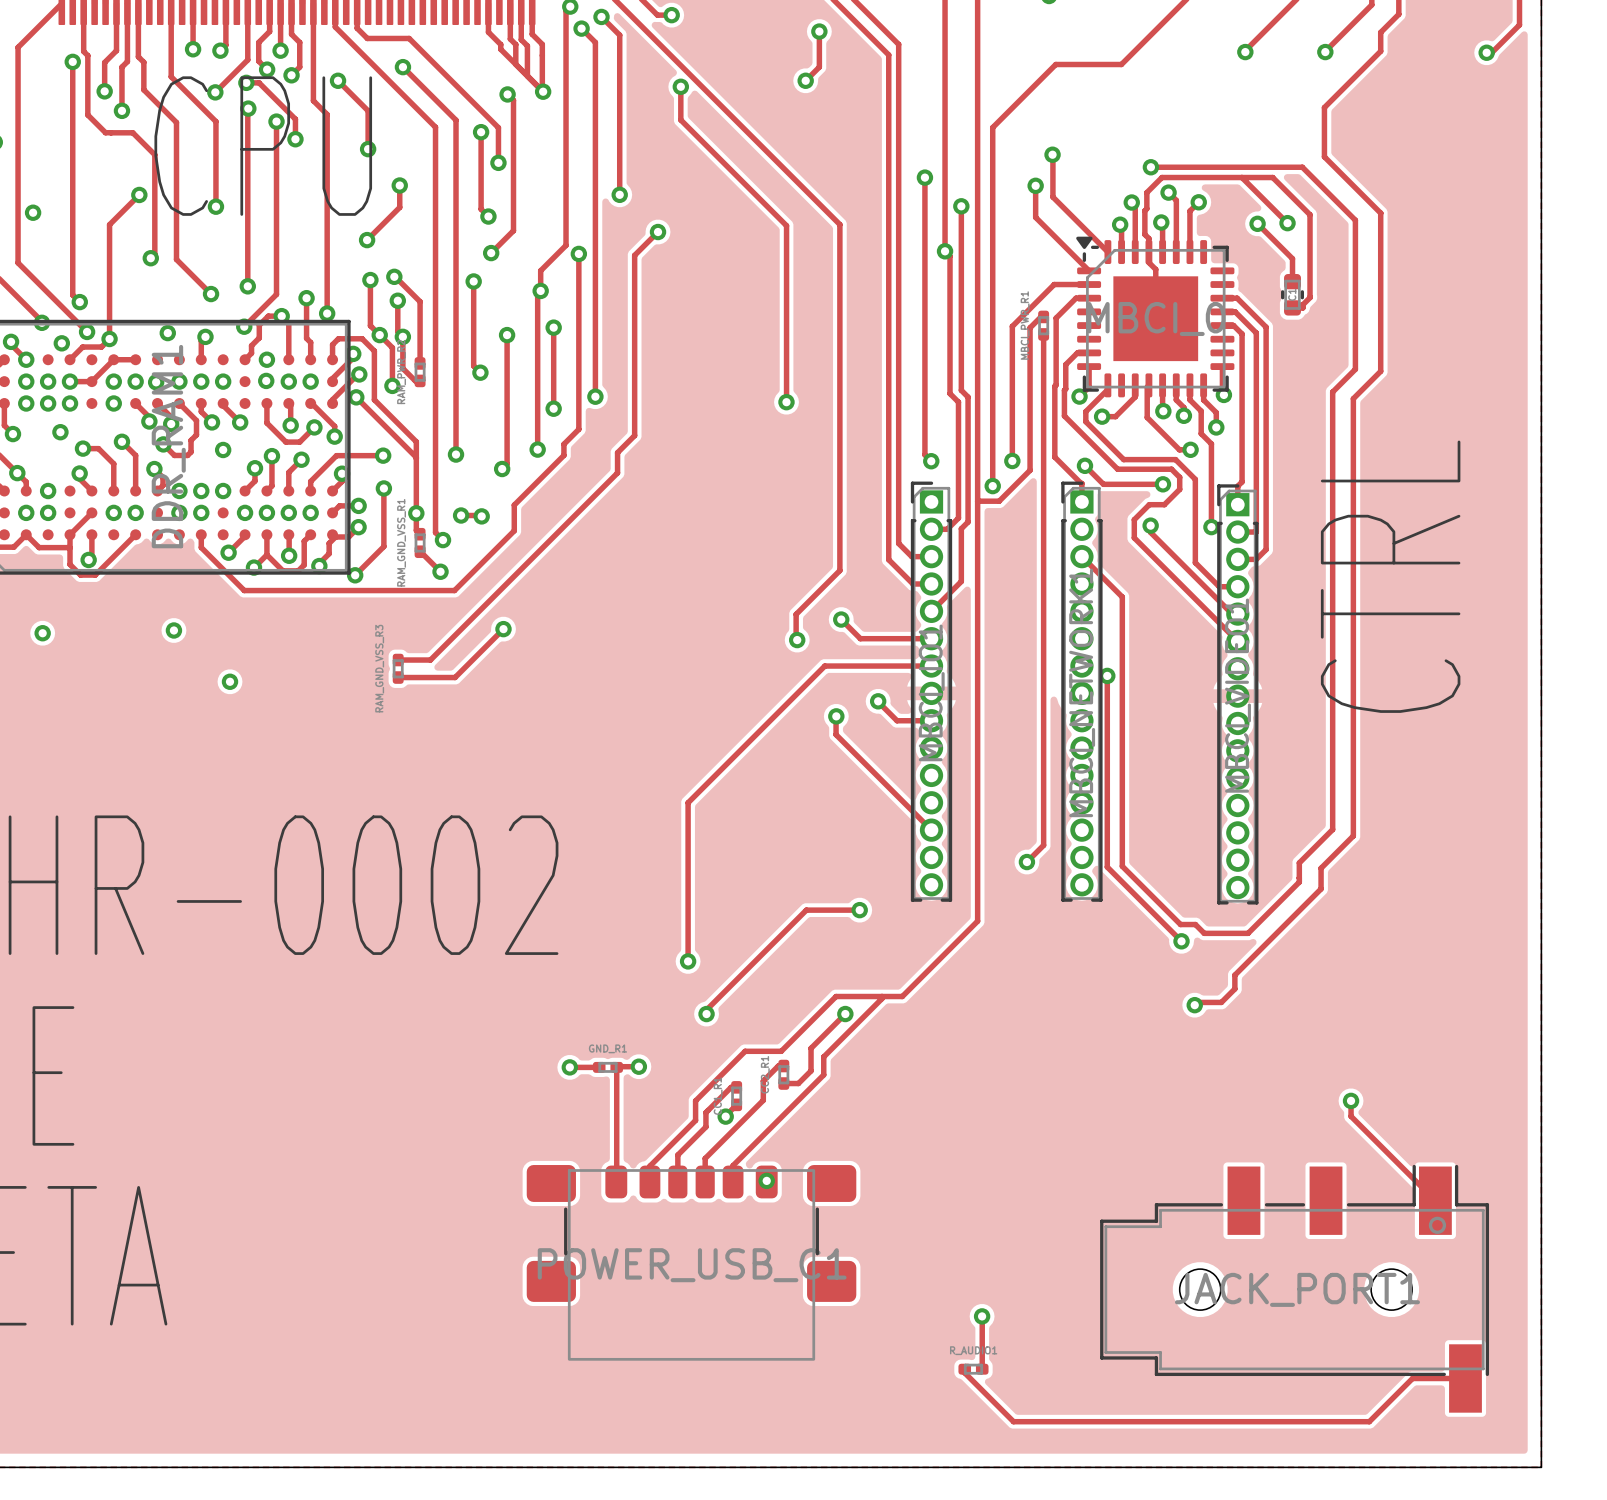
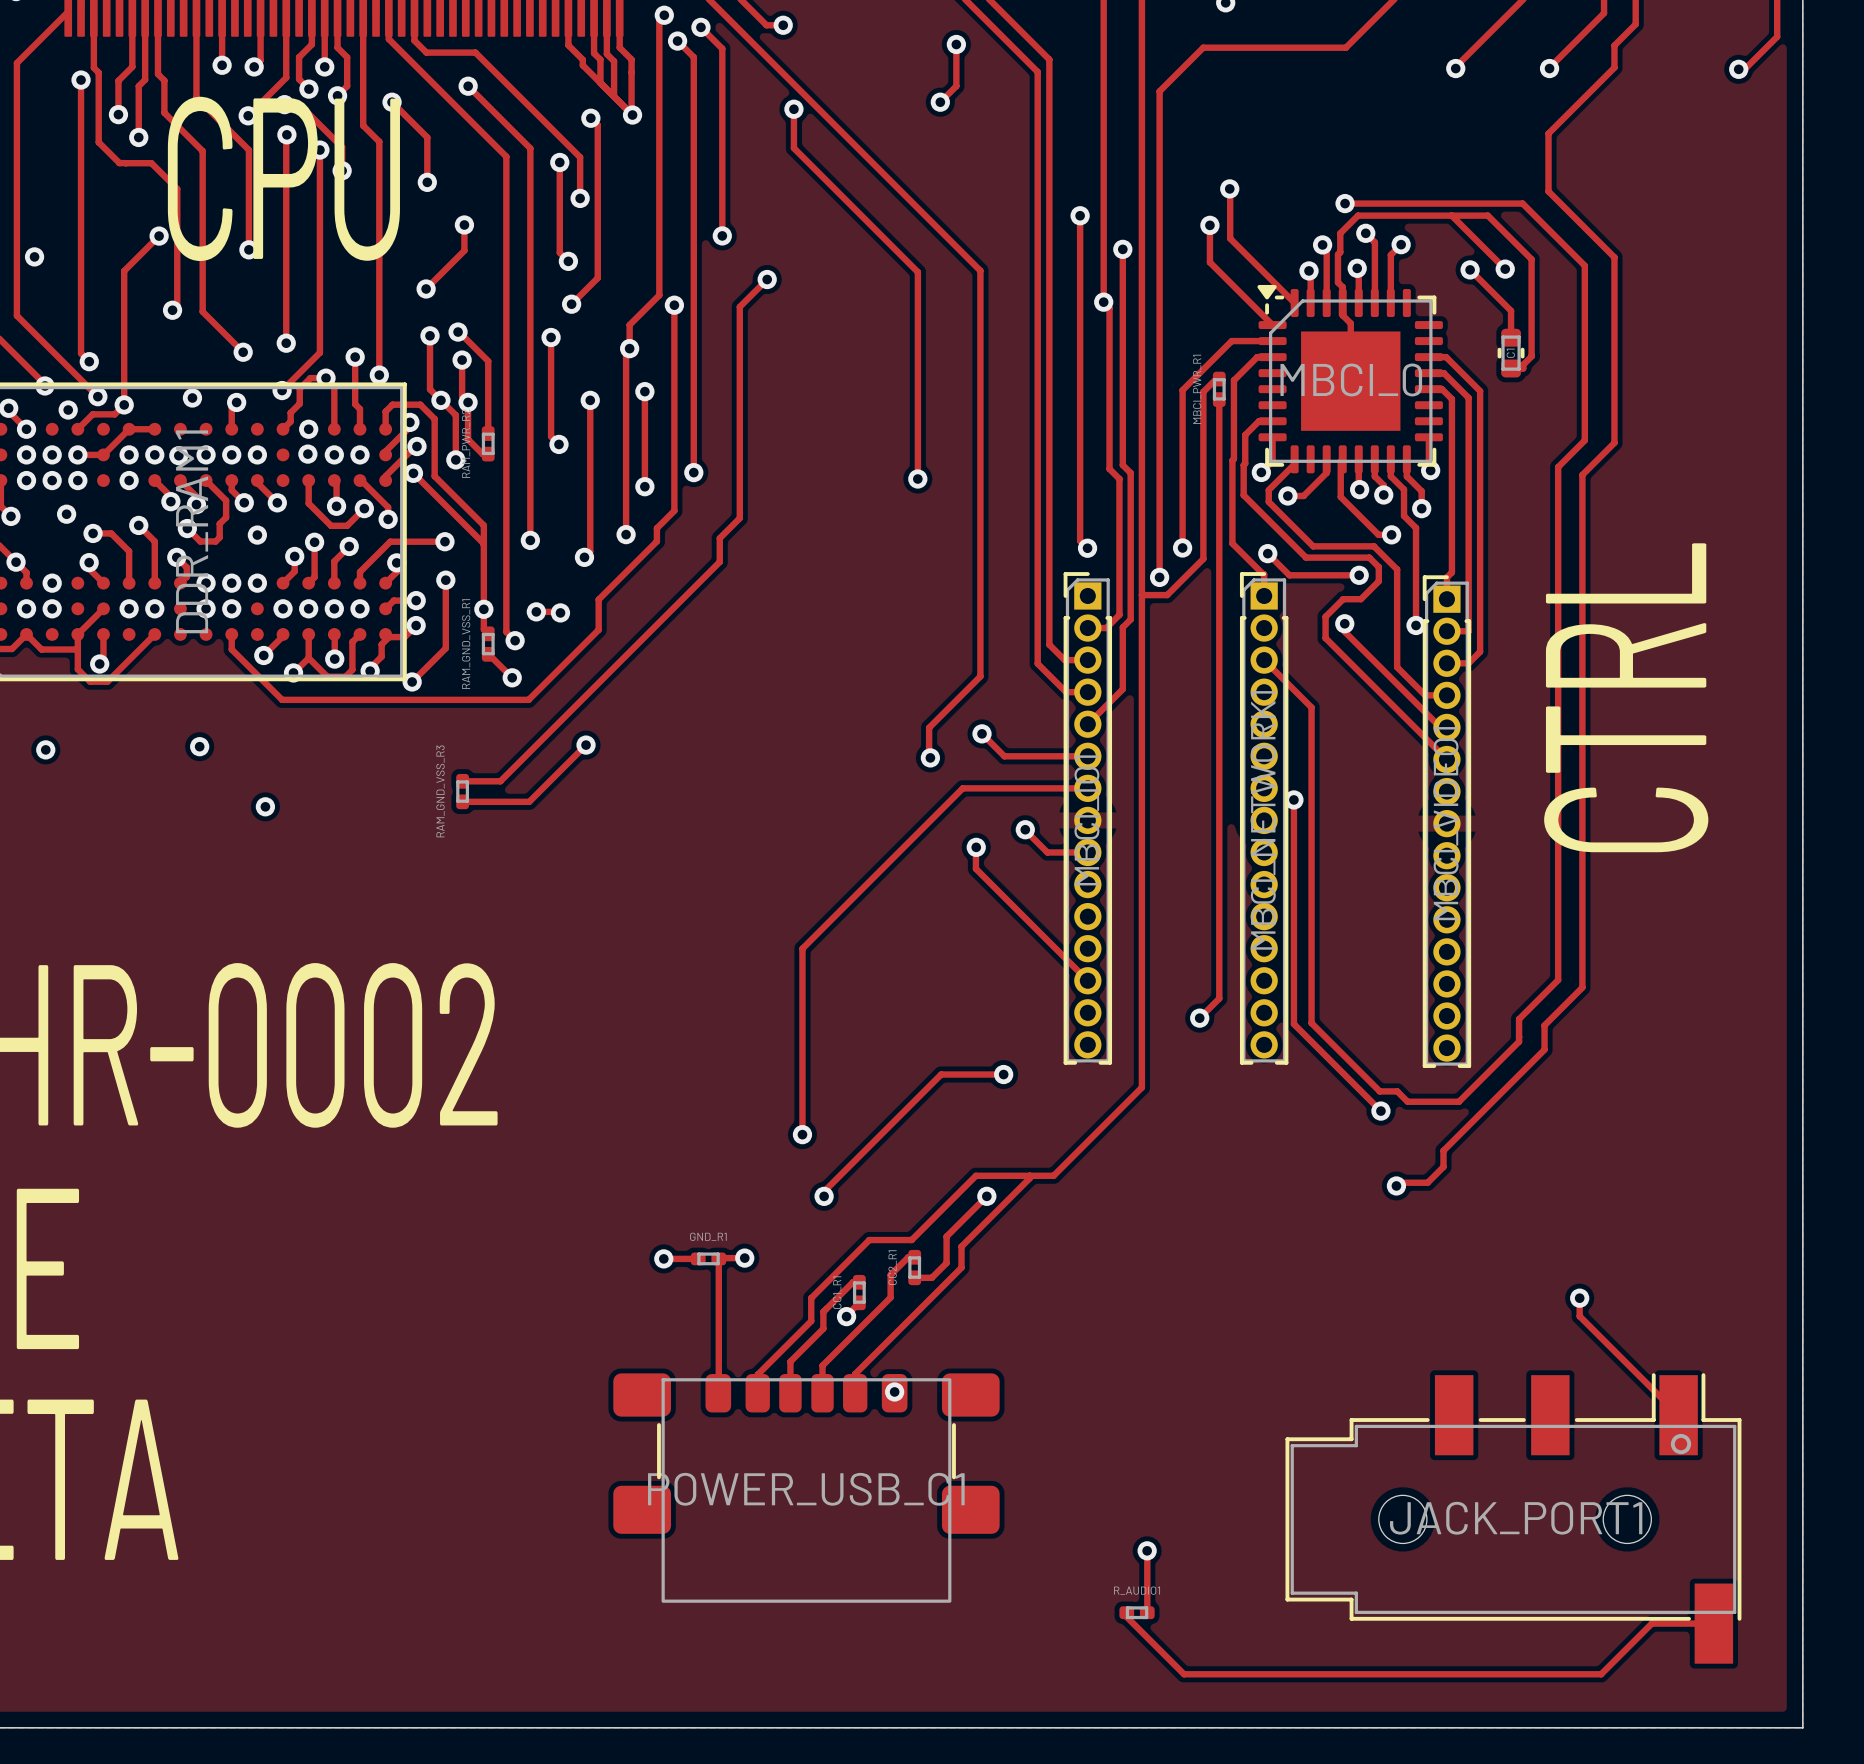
track: (1151, 34) (1121, 64) (1055, 64) (992, 127) -> (1345, 47) (1203, 47) (1159, 91) (1159, 157)

